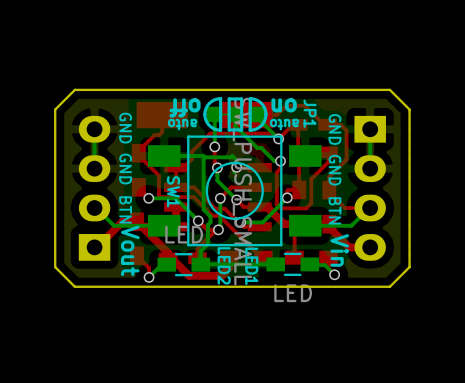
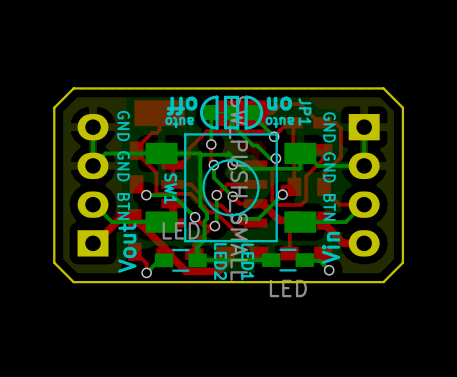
bottom track: none -> (304, 151) (318, 165) (364, 165)
bottom track: none -> (160, 153) (105, 153) (93, 165)
bottom track: none -> (300, 153) (299, 168) (243, 168) (232, 157)
text rotation: 0° (130, 250) -> 180° (127, 247)
text rotation: 0° (339, 250) -> 180° (331, 247)

